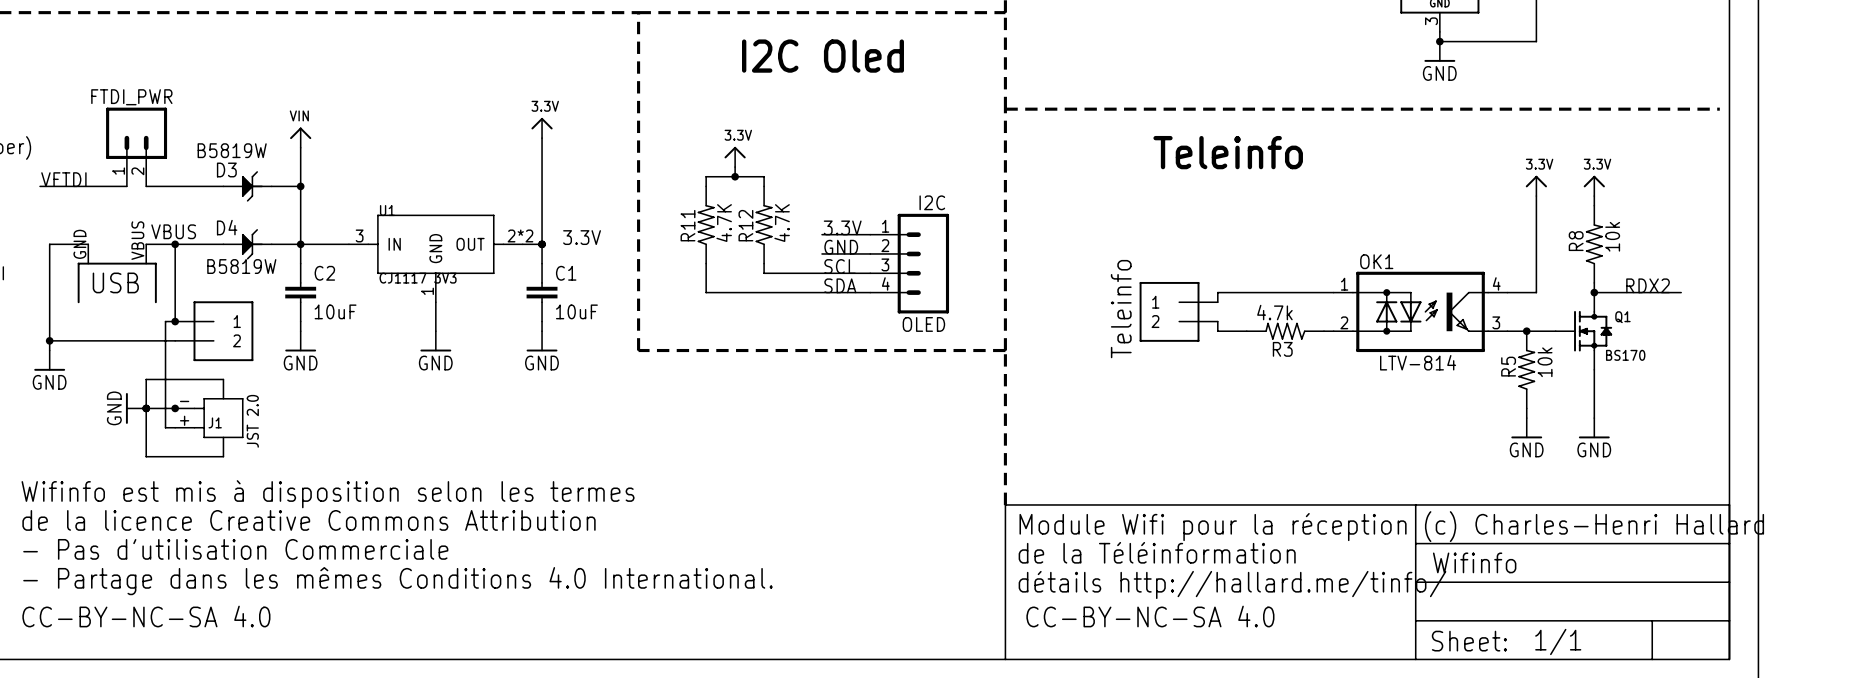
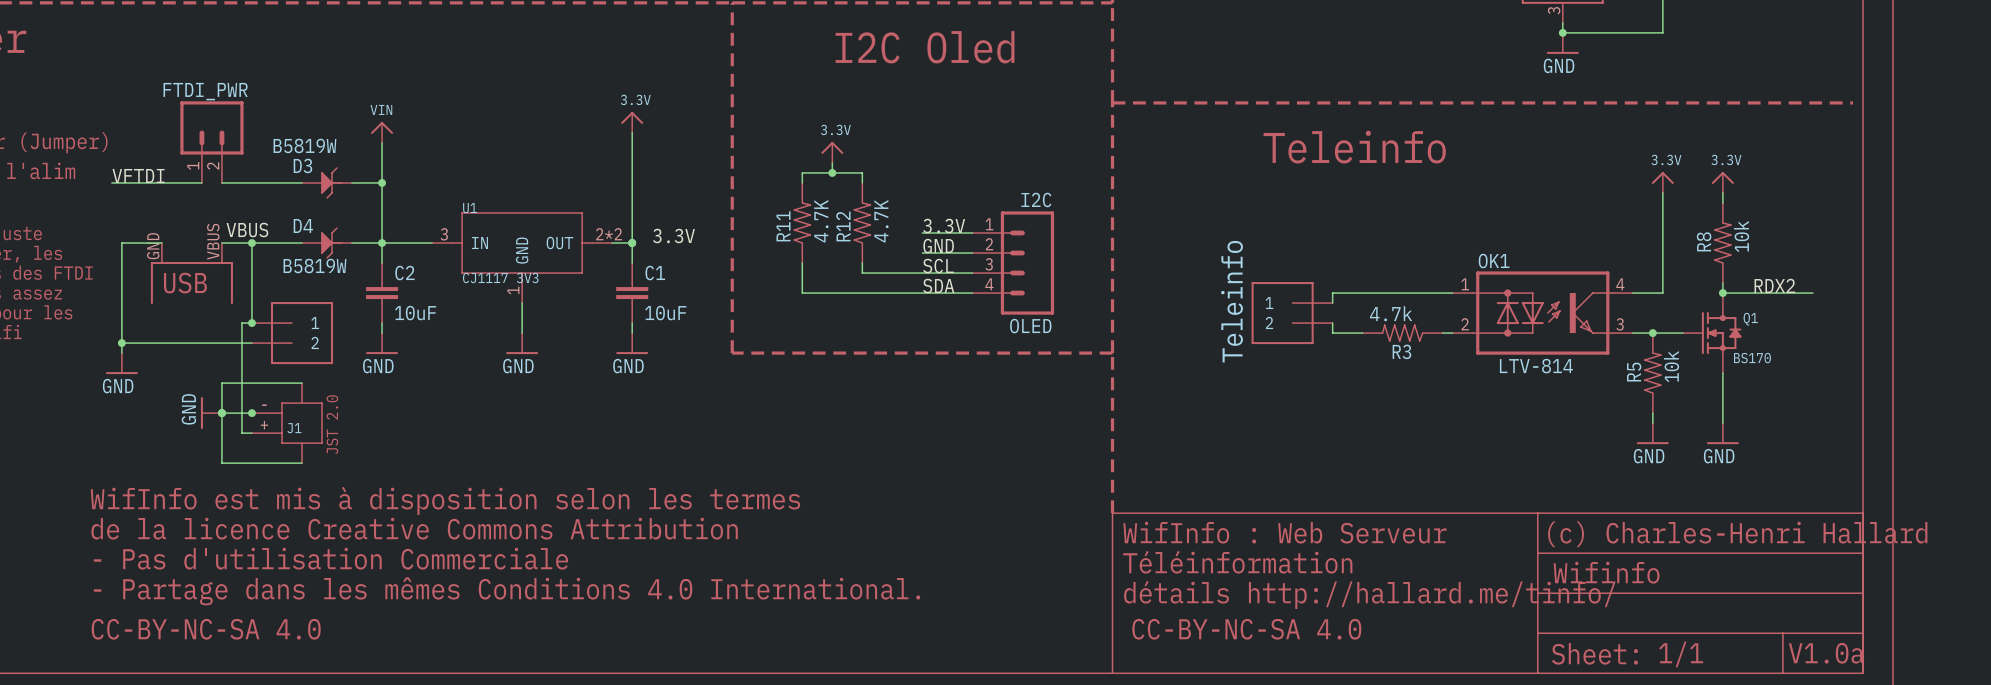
text: Wifinfo est mis à disposition selon les termes (328, 494) -> WifInfo est mis à disposition selon les termes (445, 500)
text: Module Wifi pour la réception (1213, 527) -> WifInfo : Web Serveur (1285, 532)
text: de la Téléinformation (1157, 552) -> Téléinformation (1237, 562)
text: none -> V1.0a (1826, 653)

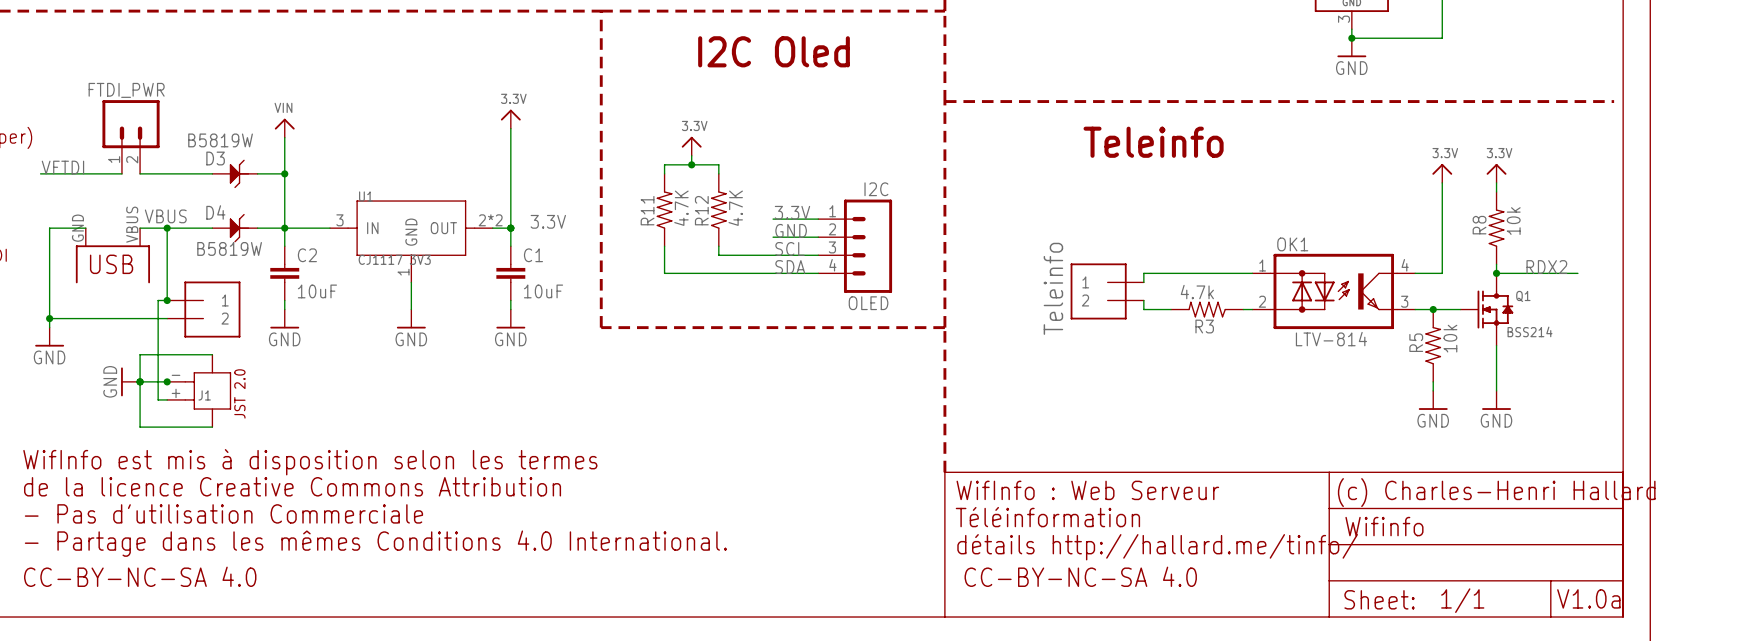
Q1 value: BS170 (1752, 358) -> BSS214 (1530, 331)

